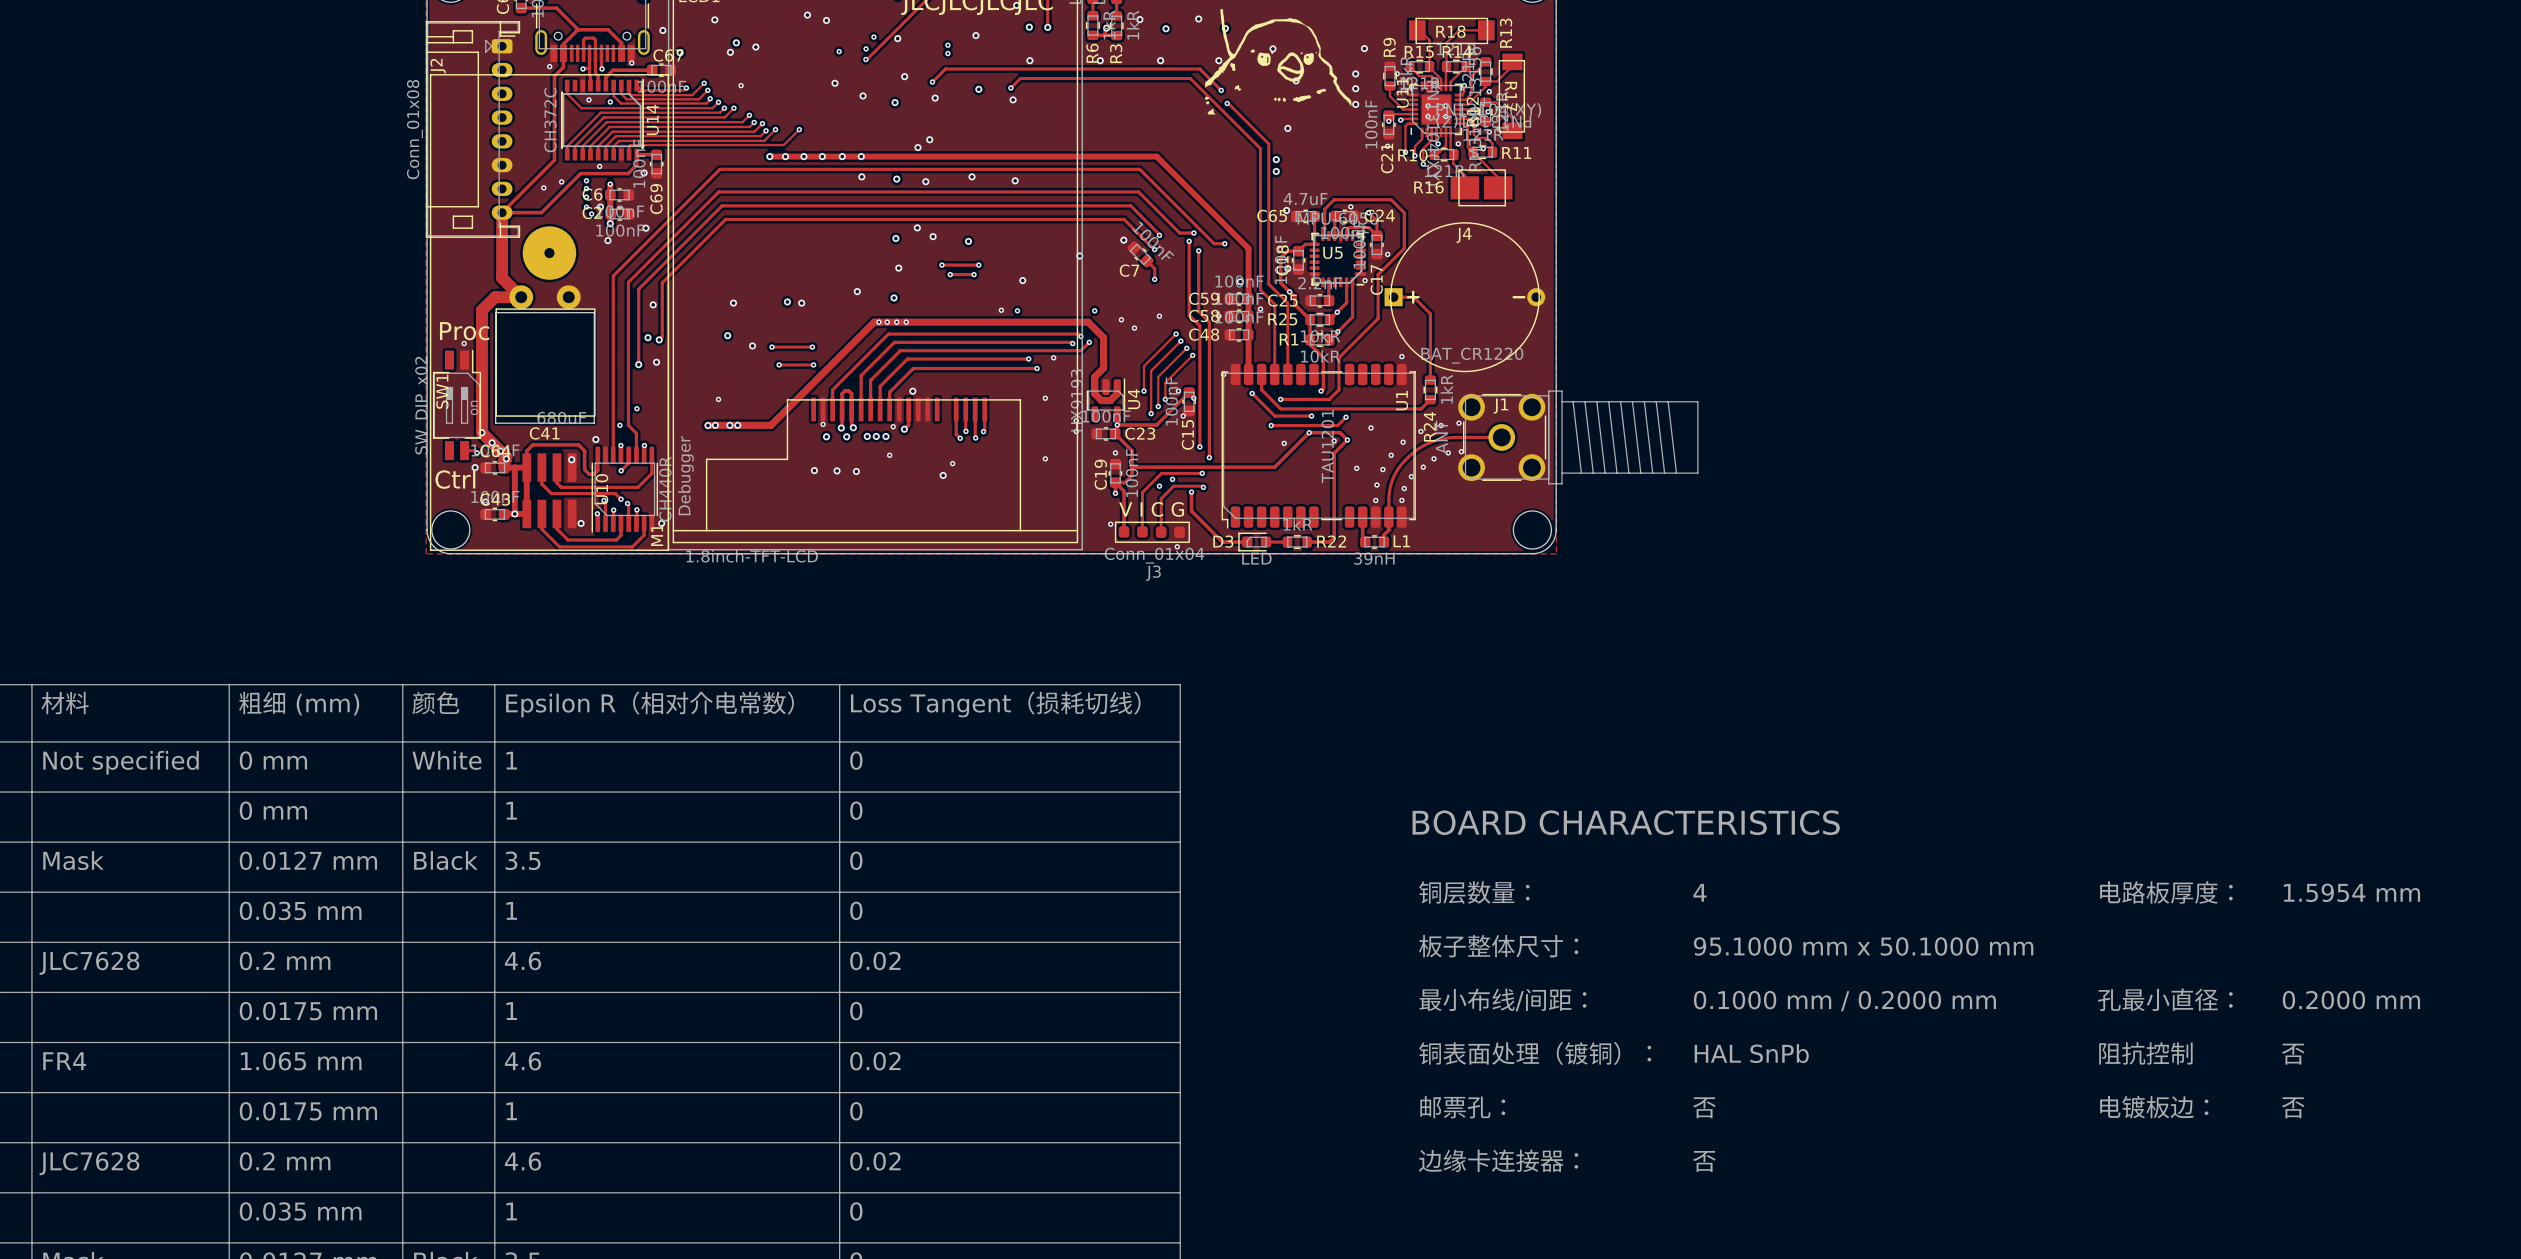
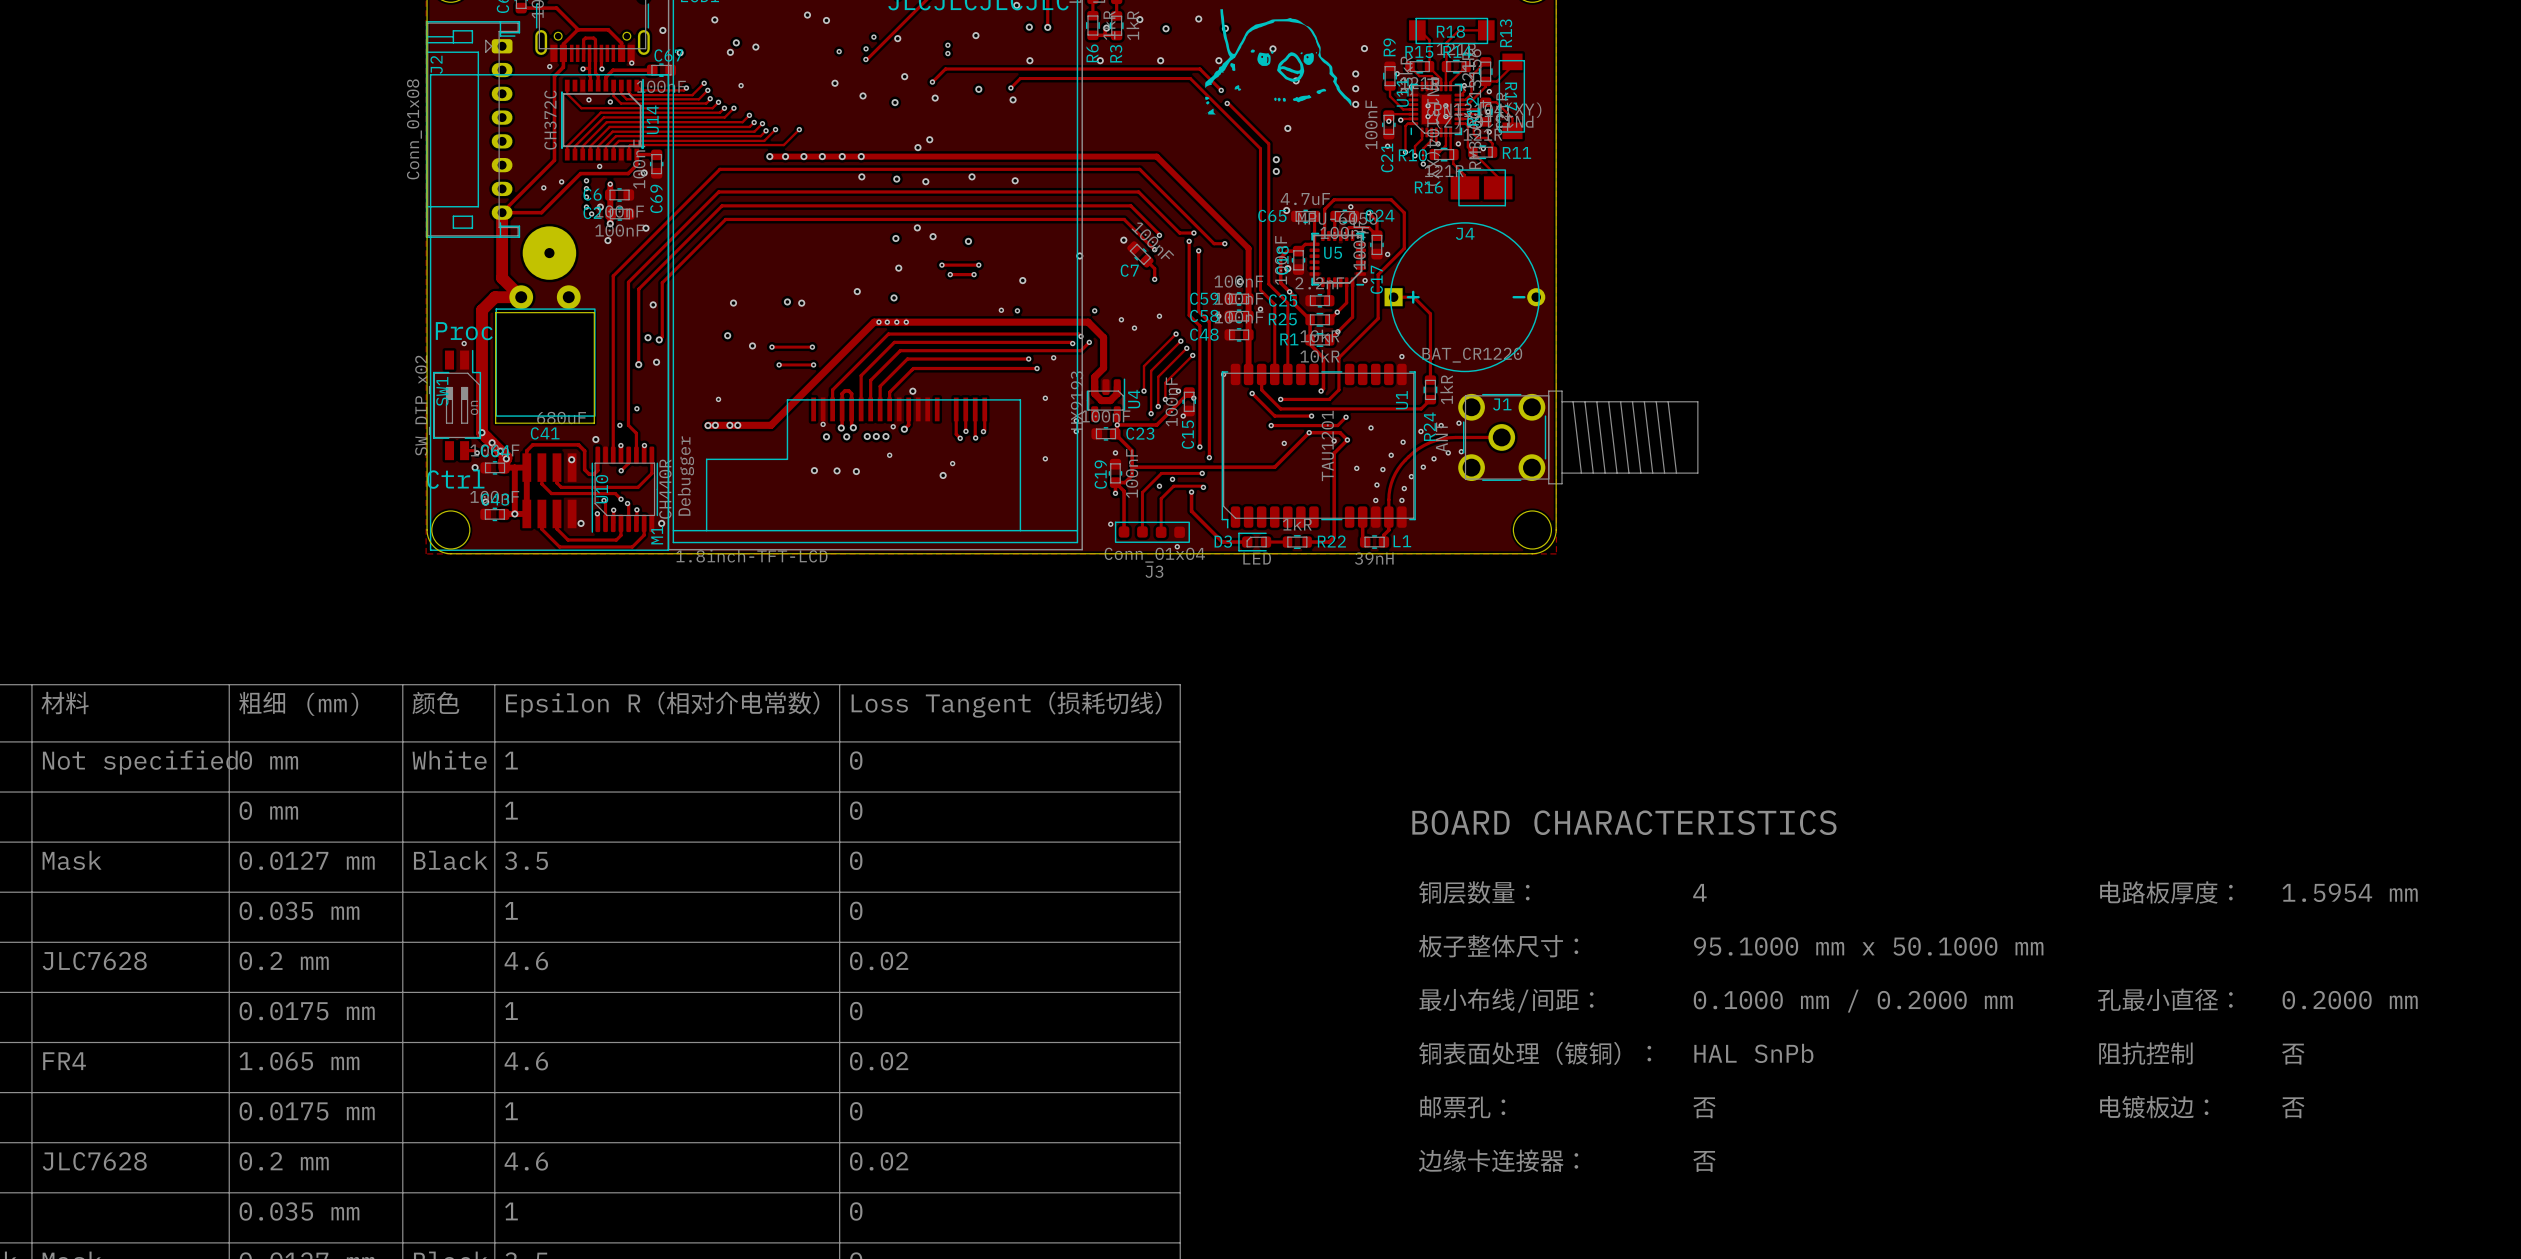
text: V I C G (1151, 509) -> none

